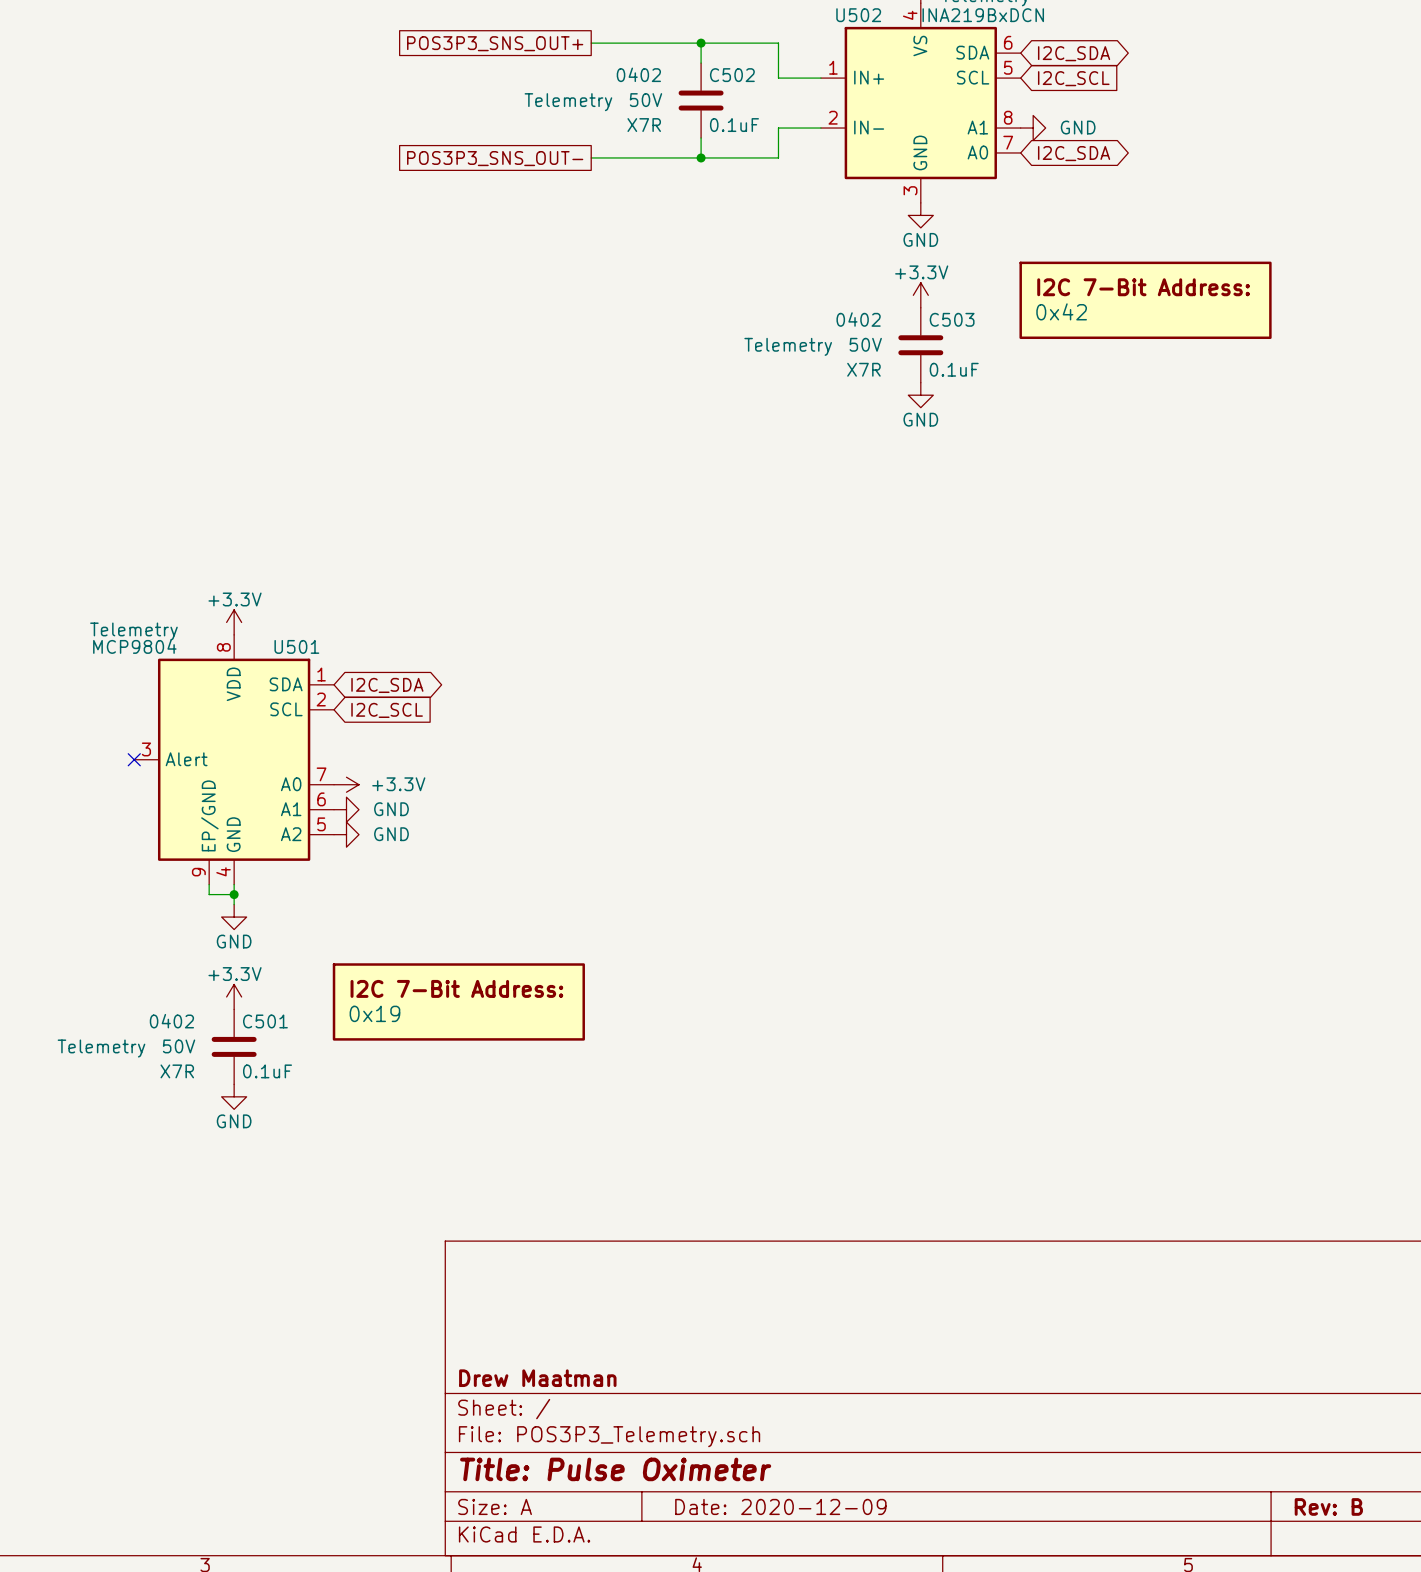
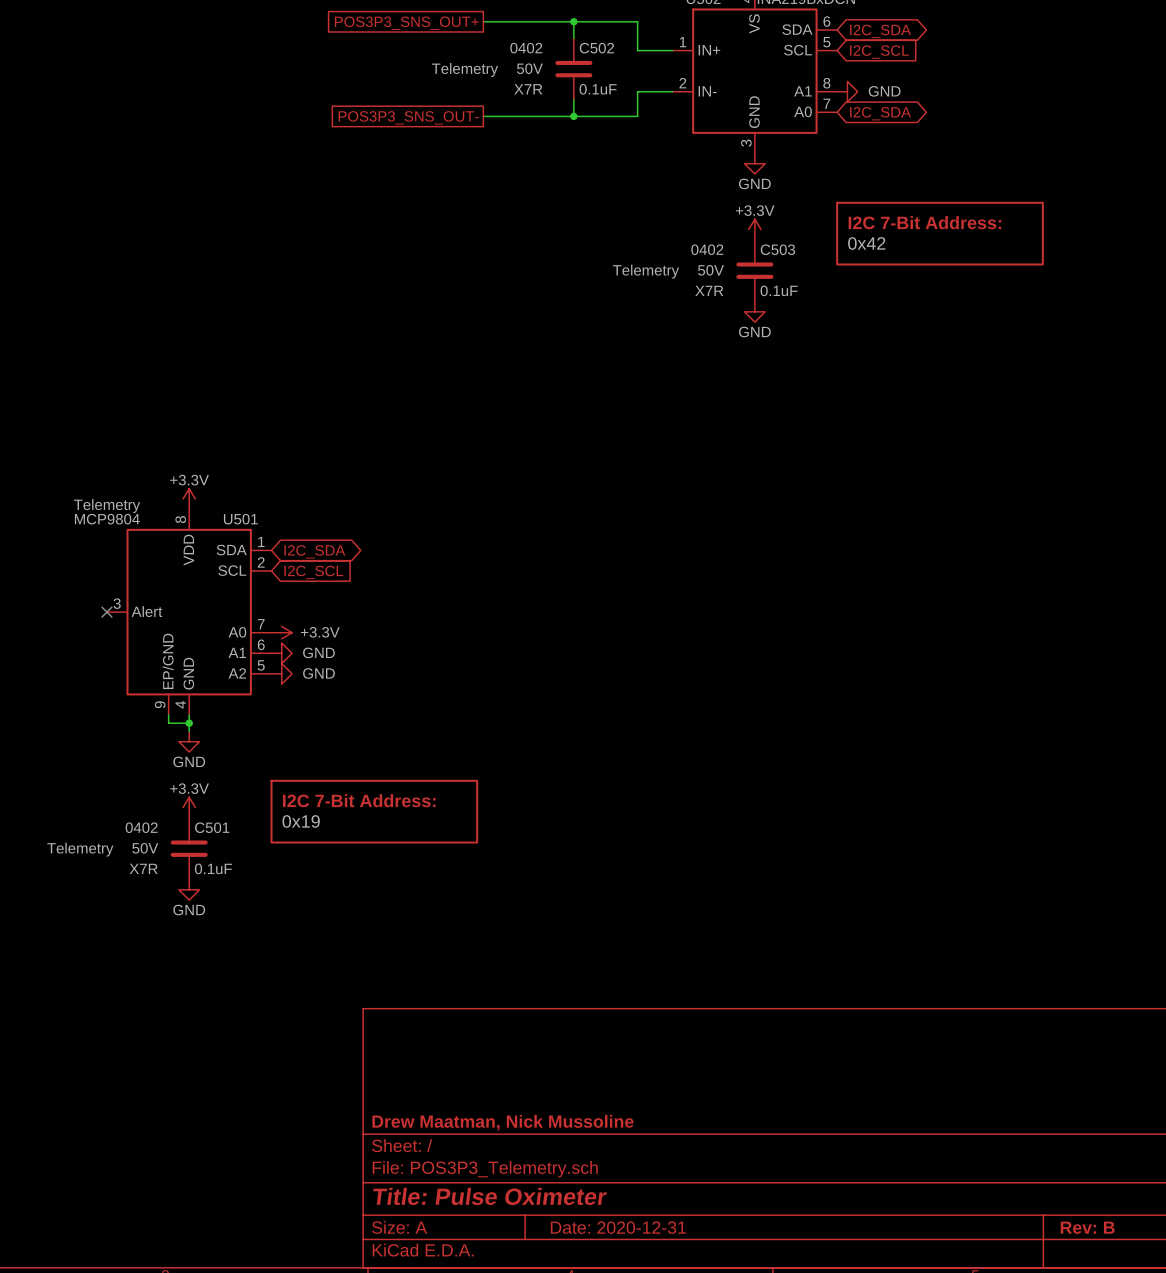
title block: Drew Maatman (537, 1378) -> Drew Maatman, Nick Mussoline (503, 1122)
title block: Date: 2020-12-09 (780, 1506) -> Date: 2020-12-31 (618, 1227)

